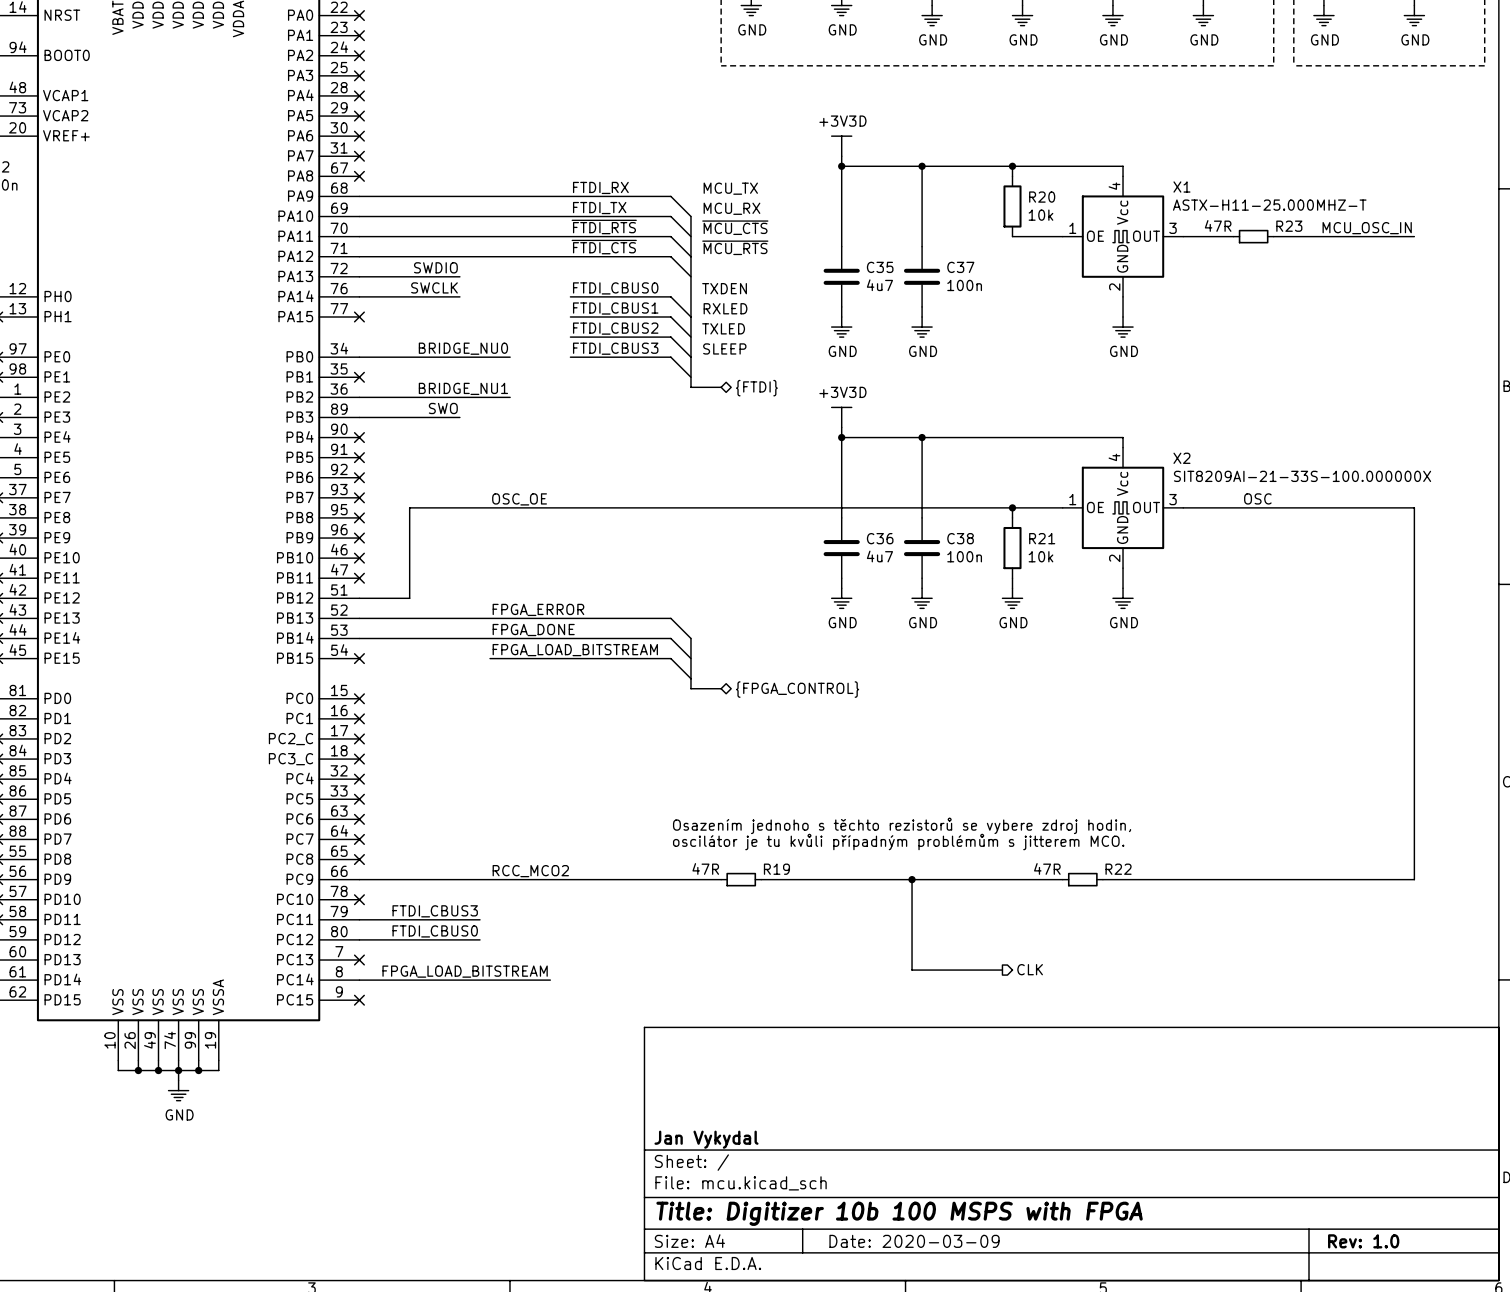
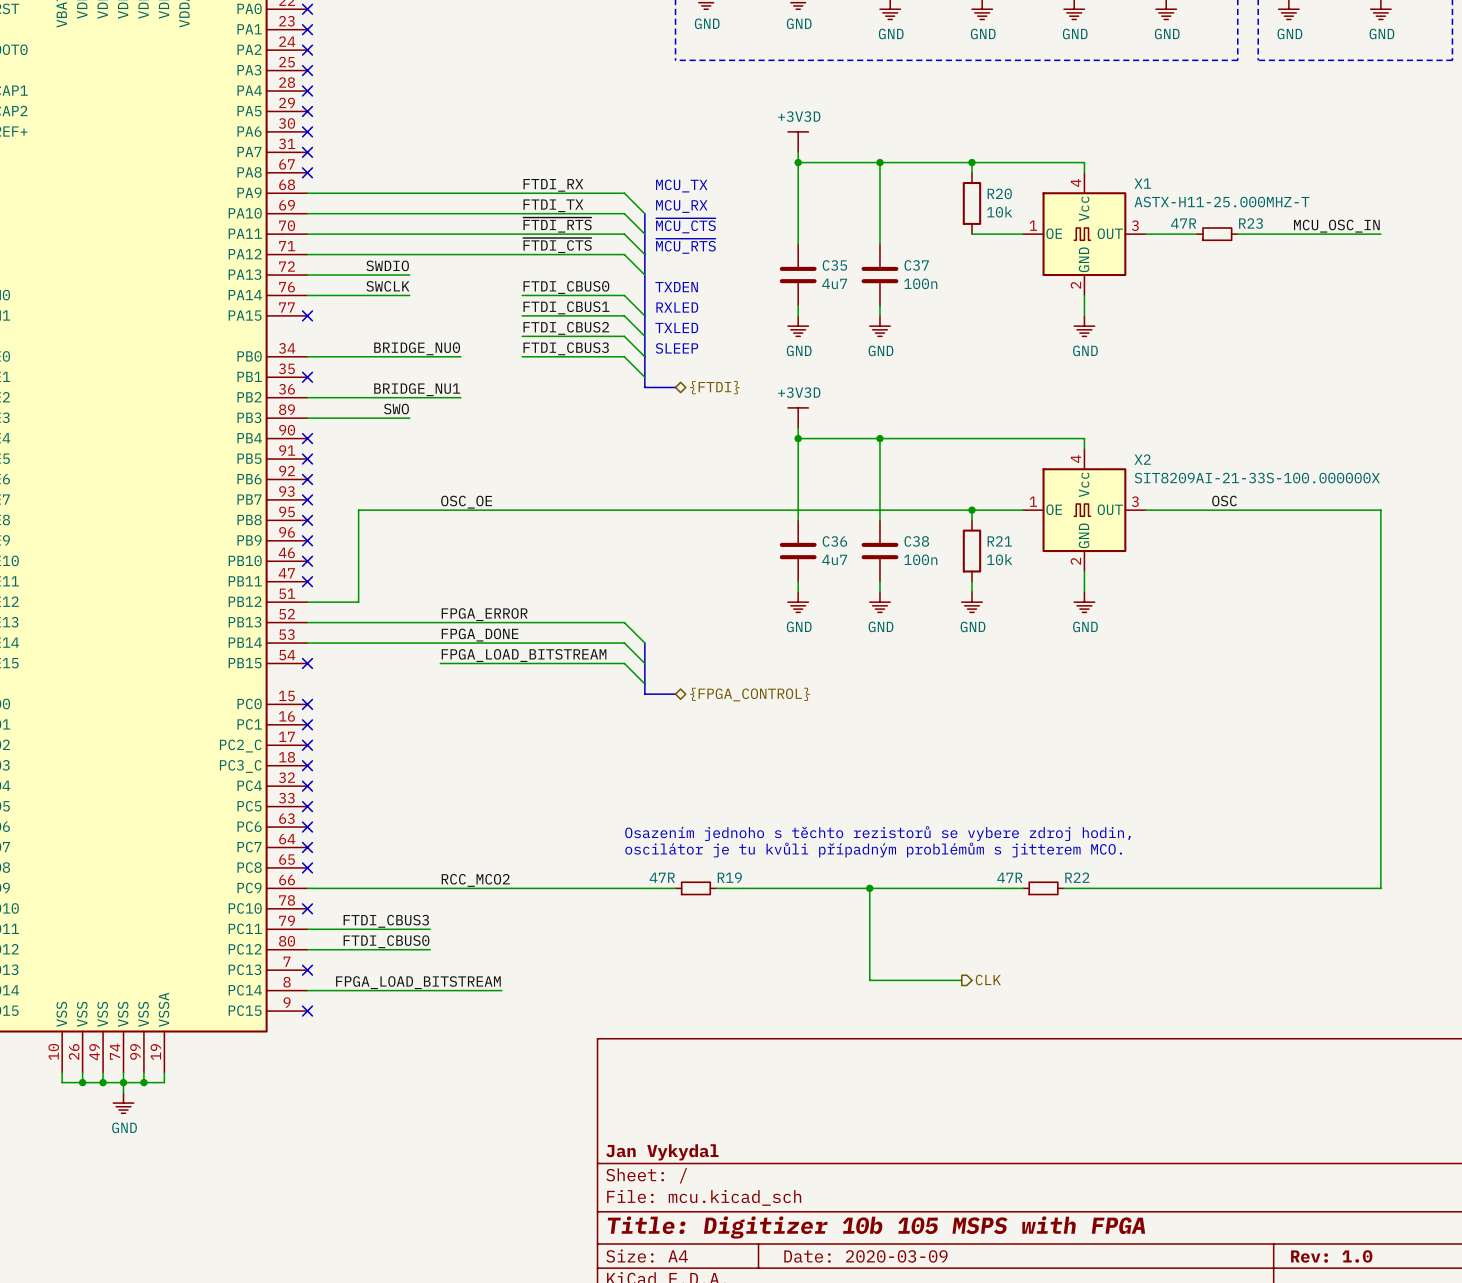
title block: Title: Digitizer 10b 100 MSPS with FPGA (899, 1213) -> Title: Digitizer 10b 105 MSPS with FPGA (876, 1227)

